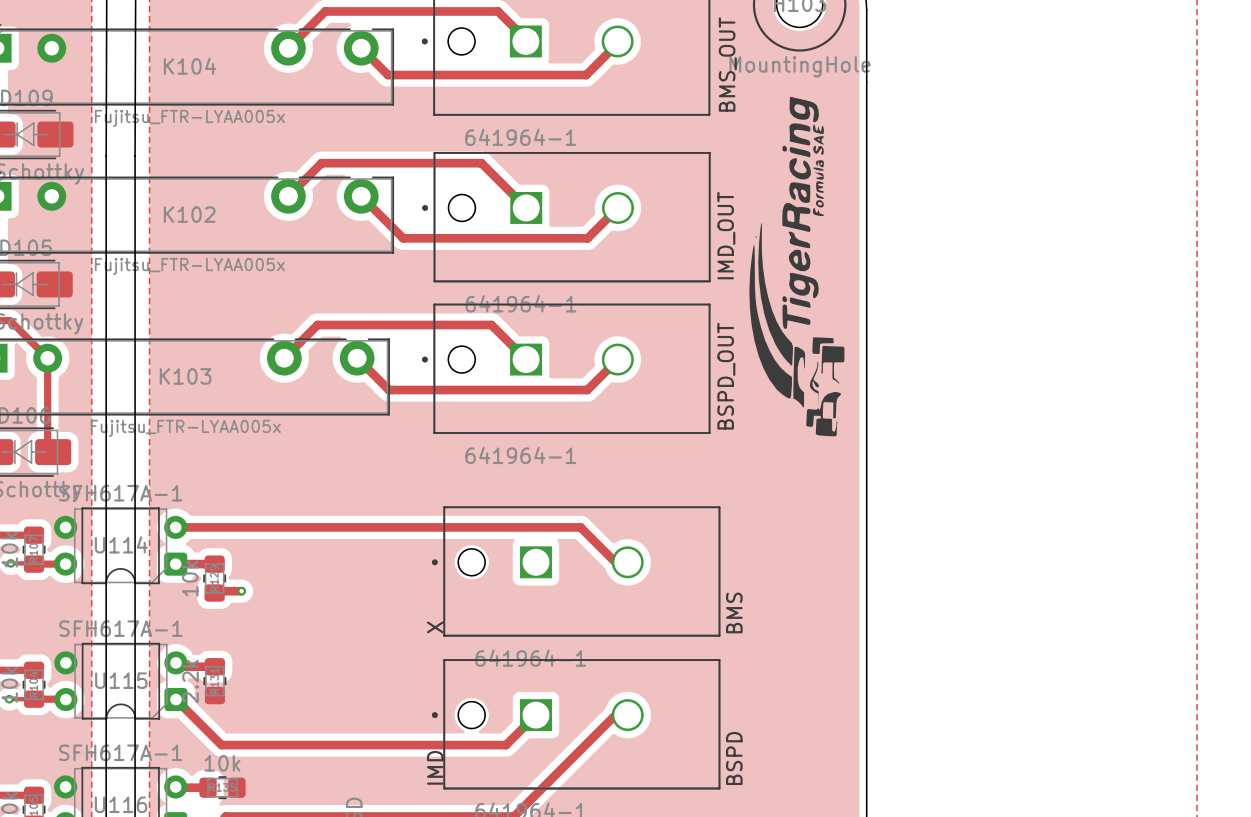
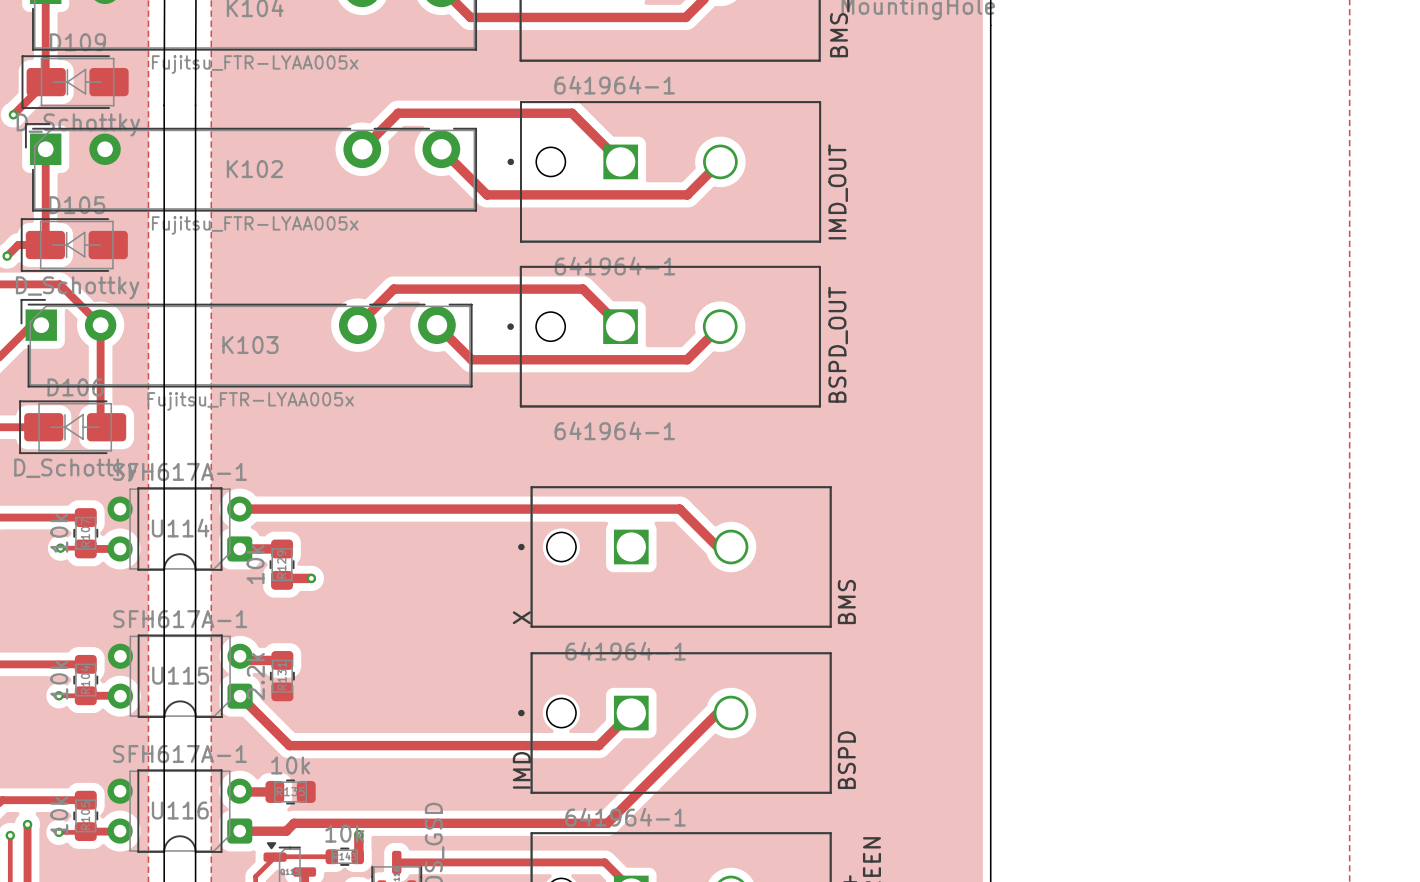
drawing: [749, 96, 845, 437] -> none

